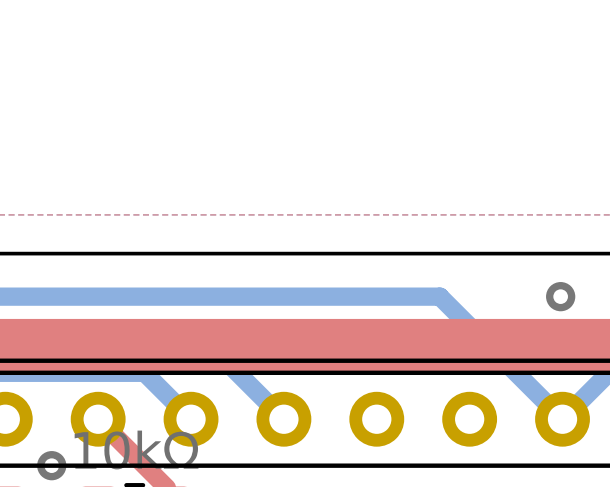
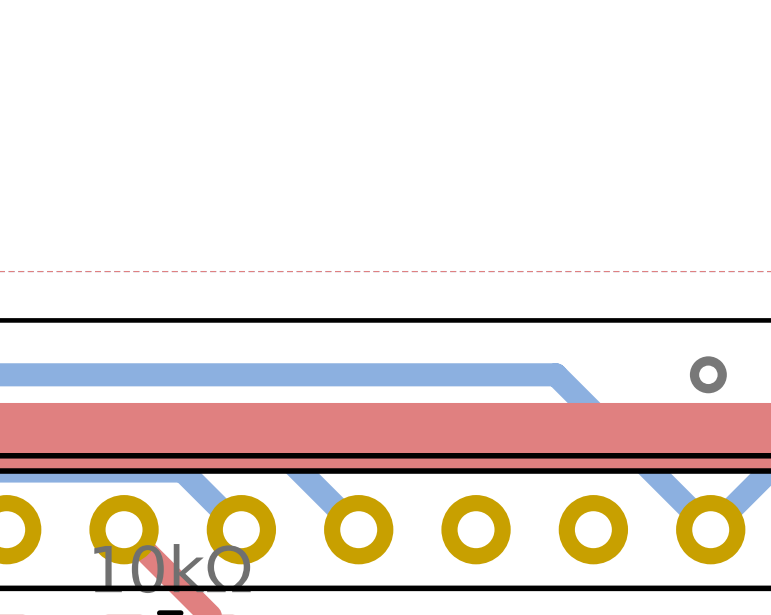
via: (51, 465) -> none

